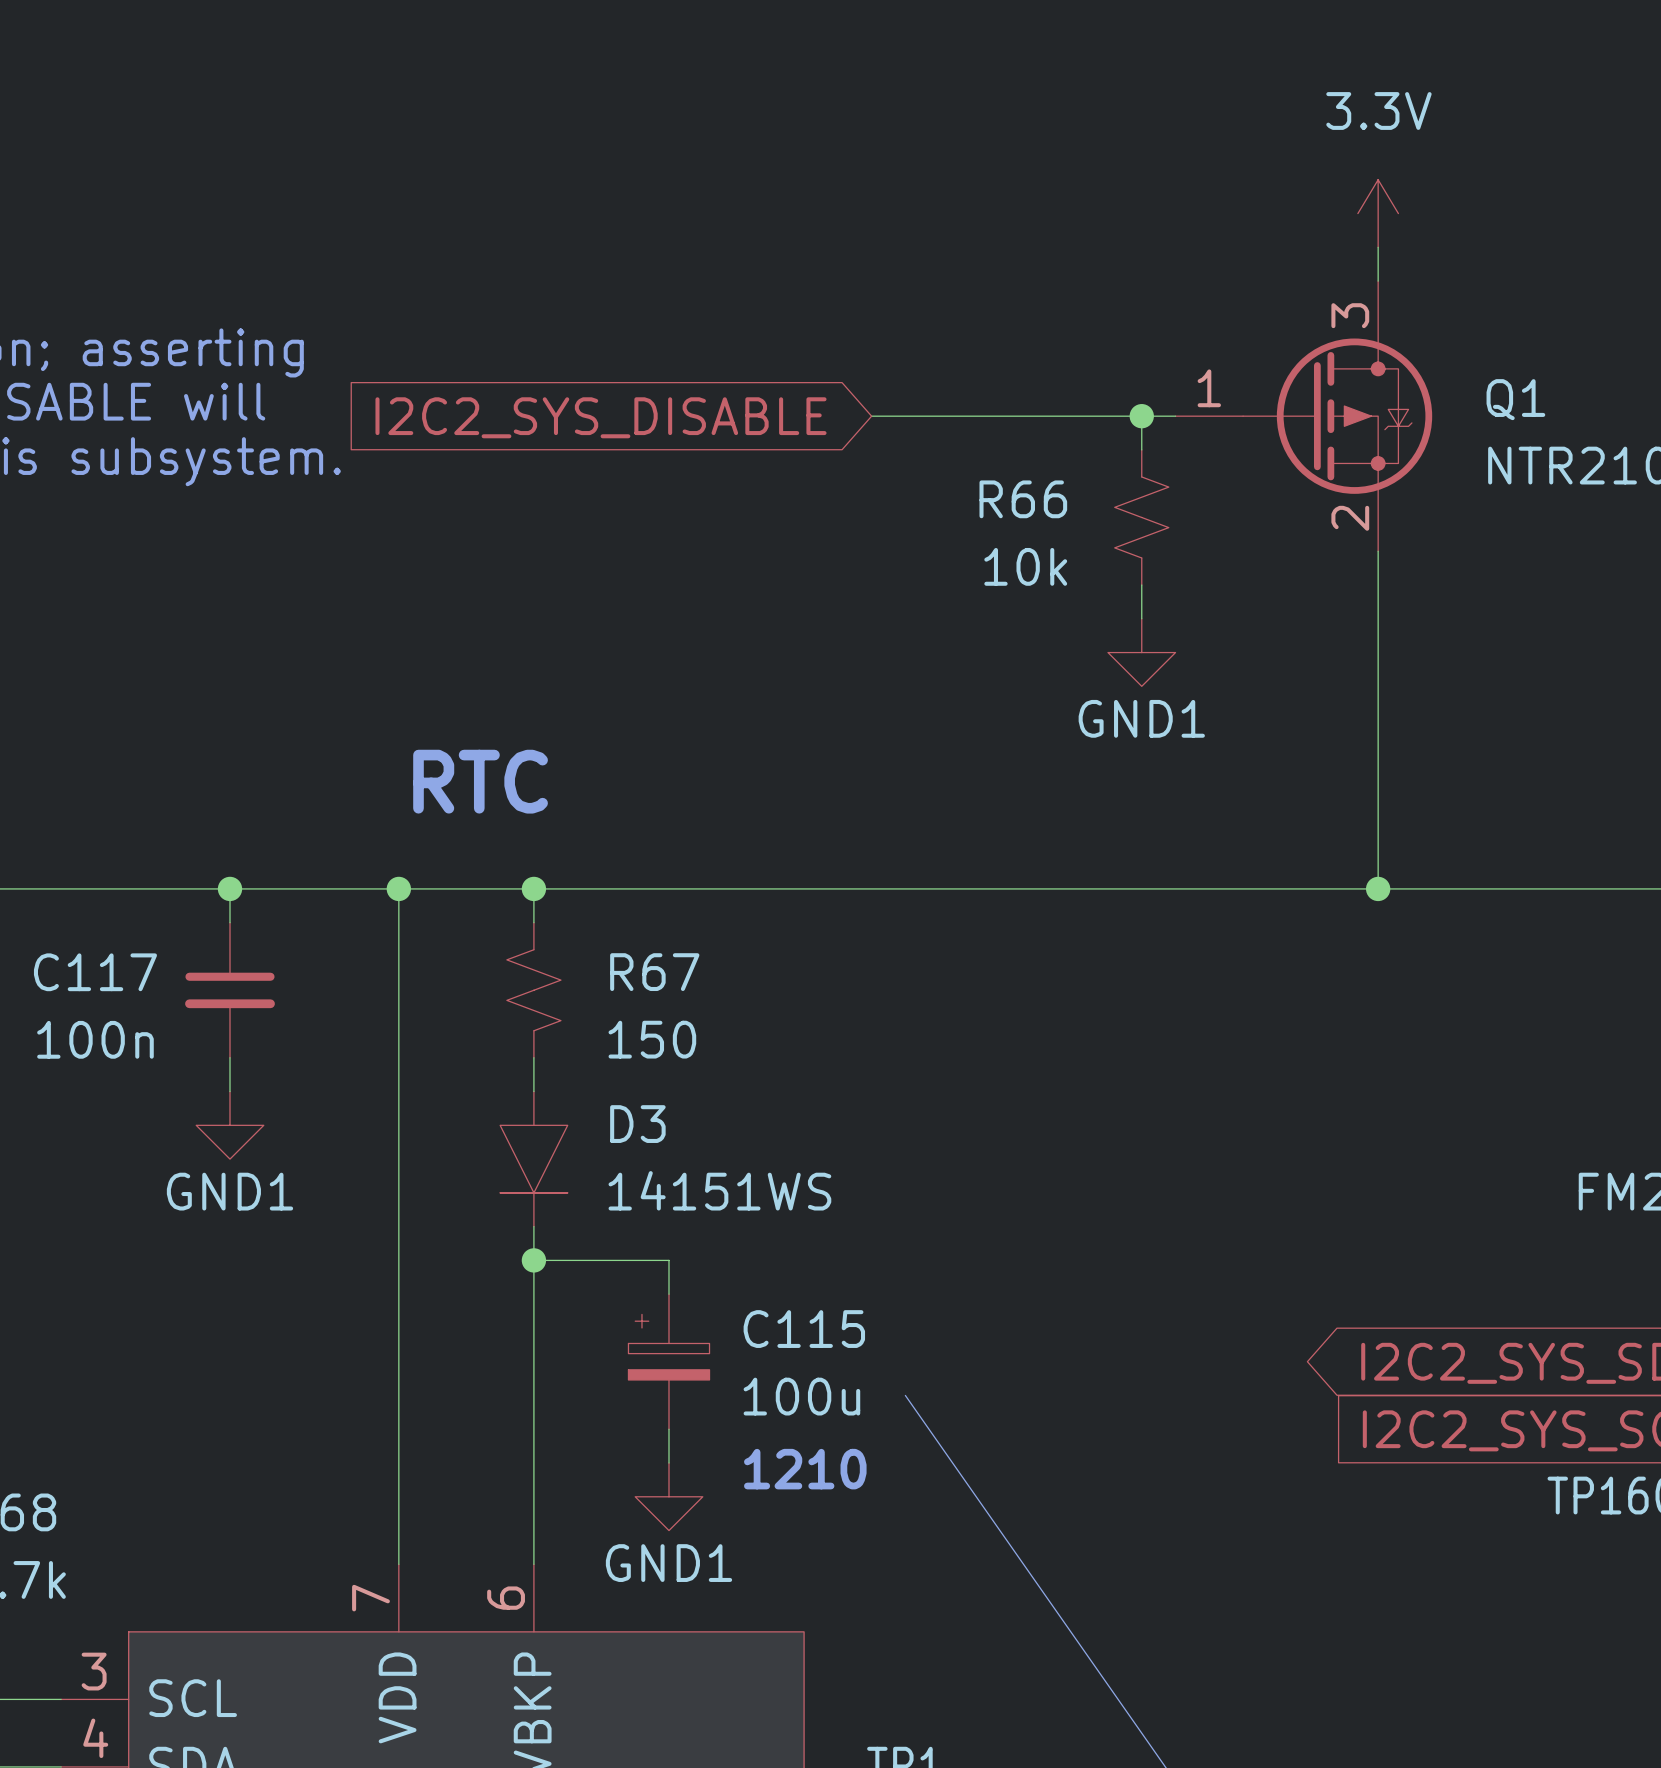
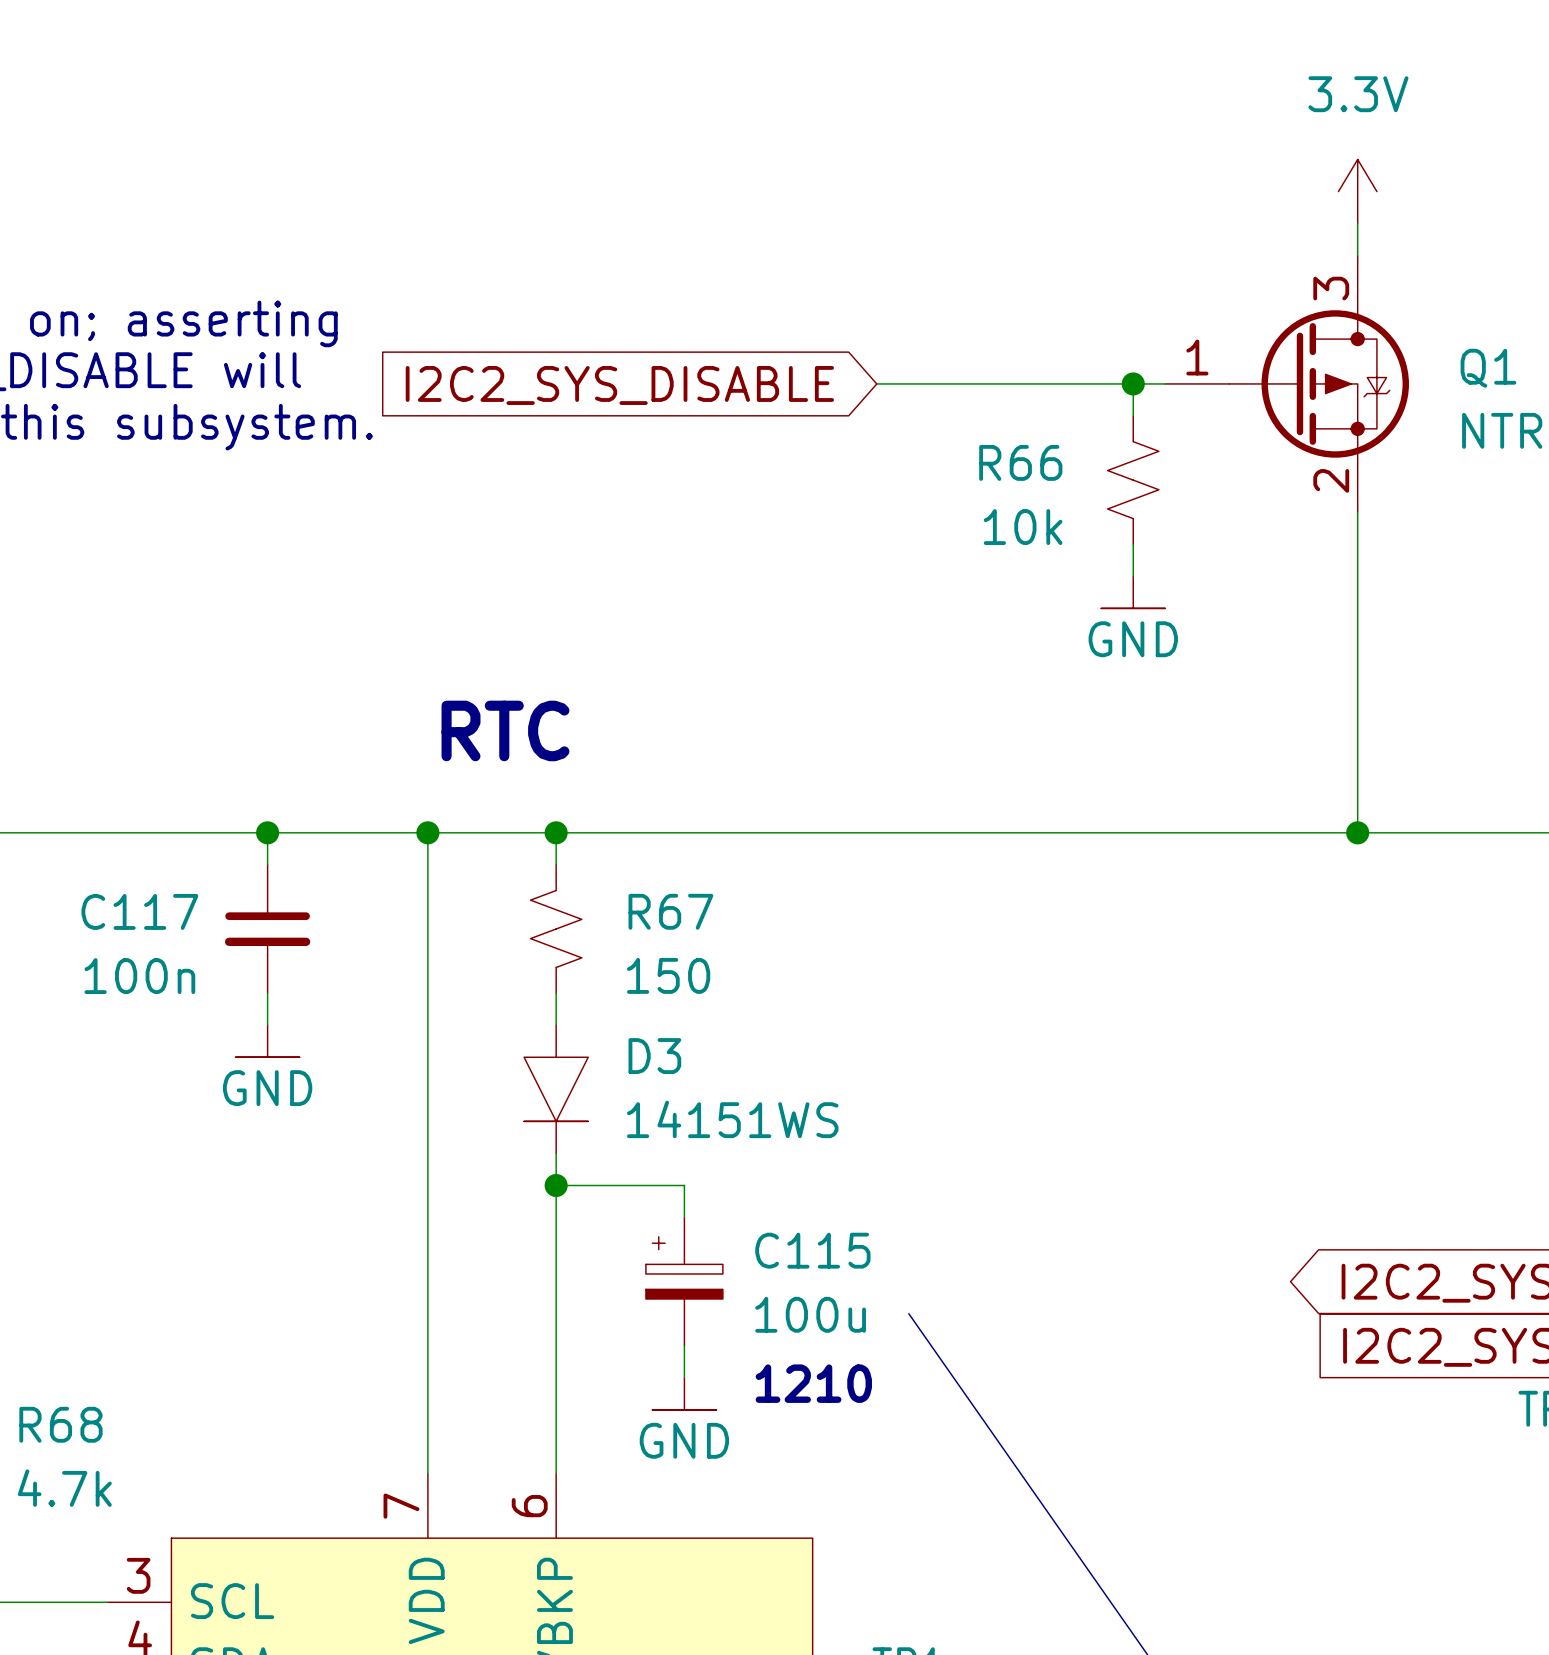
power symbol: GND1 (1141, 652) -> GND (1133, 592)
power symbol: GND1 (229, 1125) -> GND (267, 1041)
power symbol: GND1 (668, 1496) -> GND (684, 1393)

